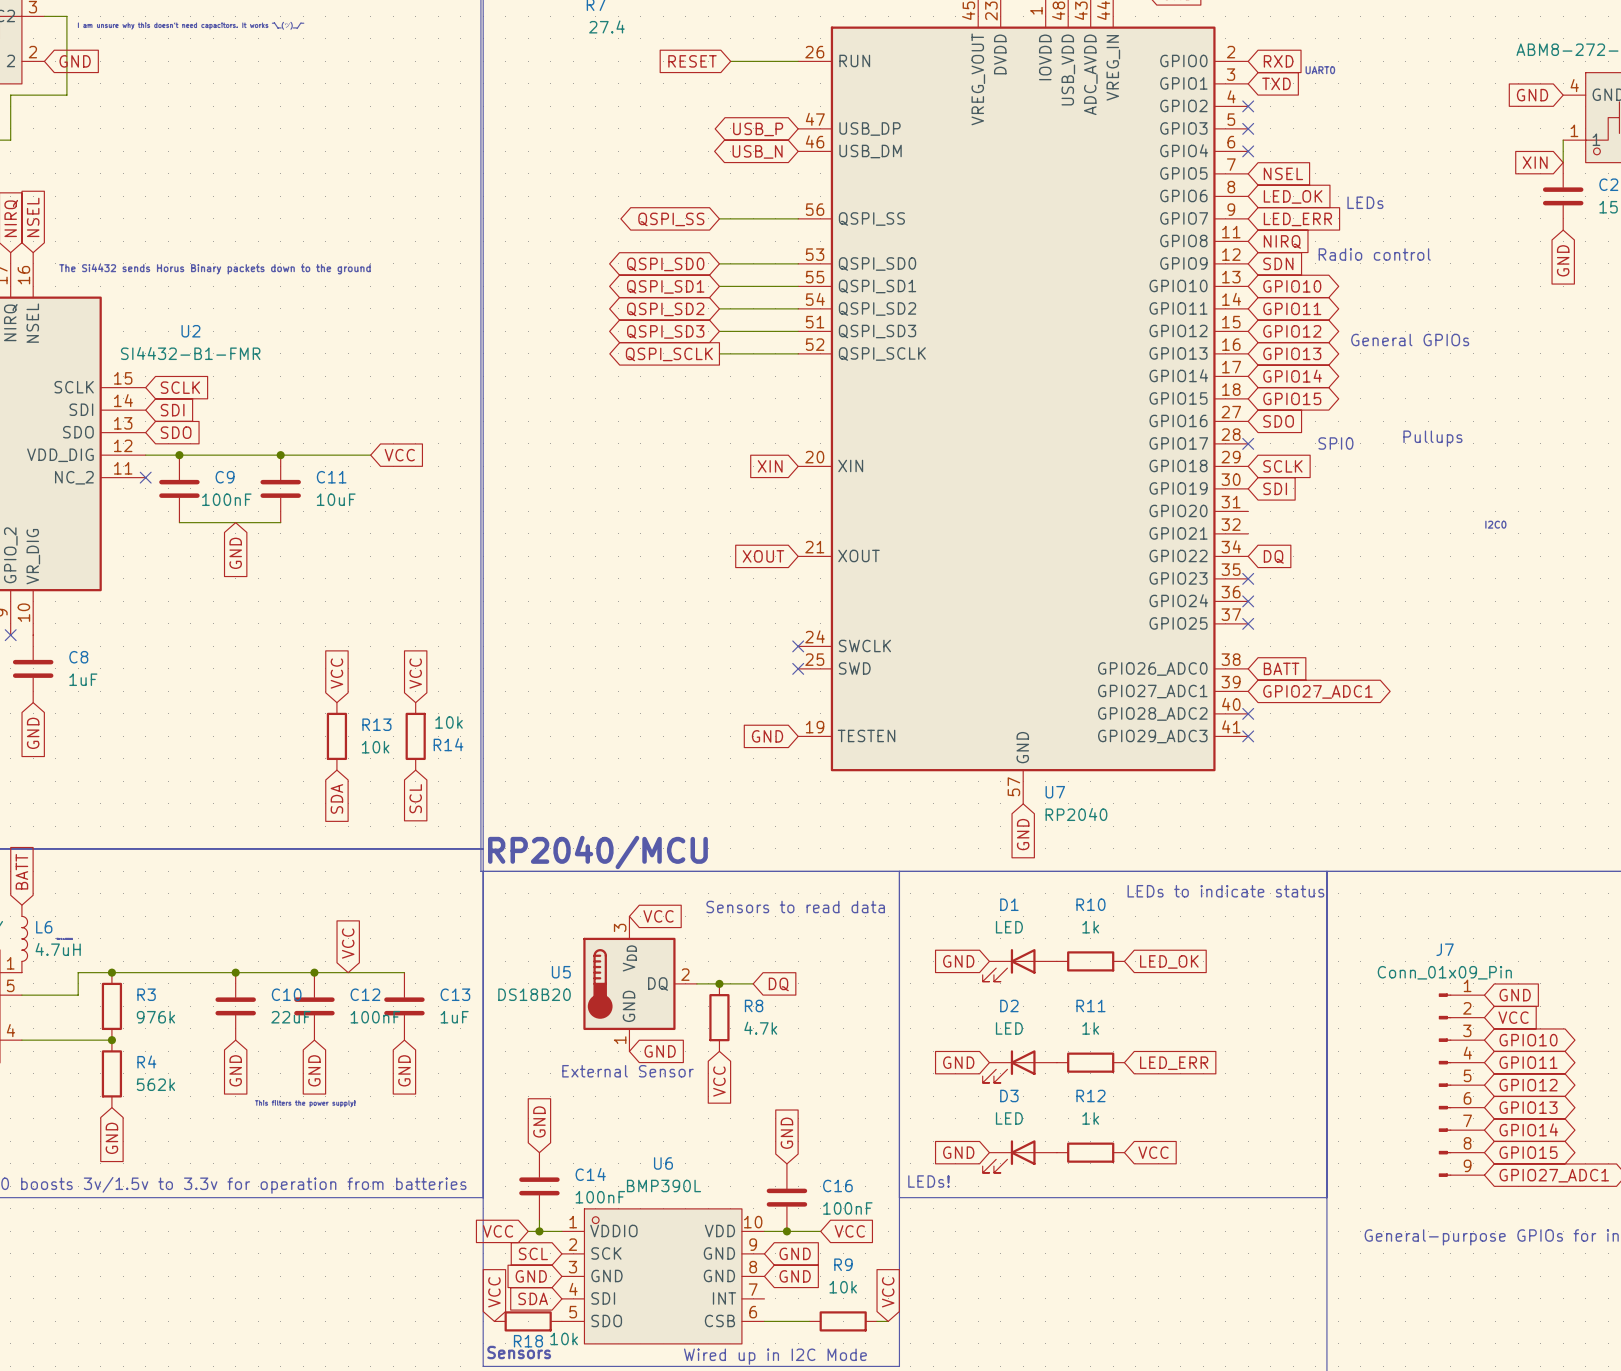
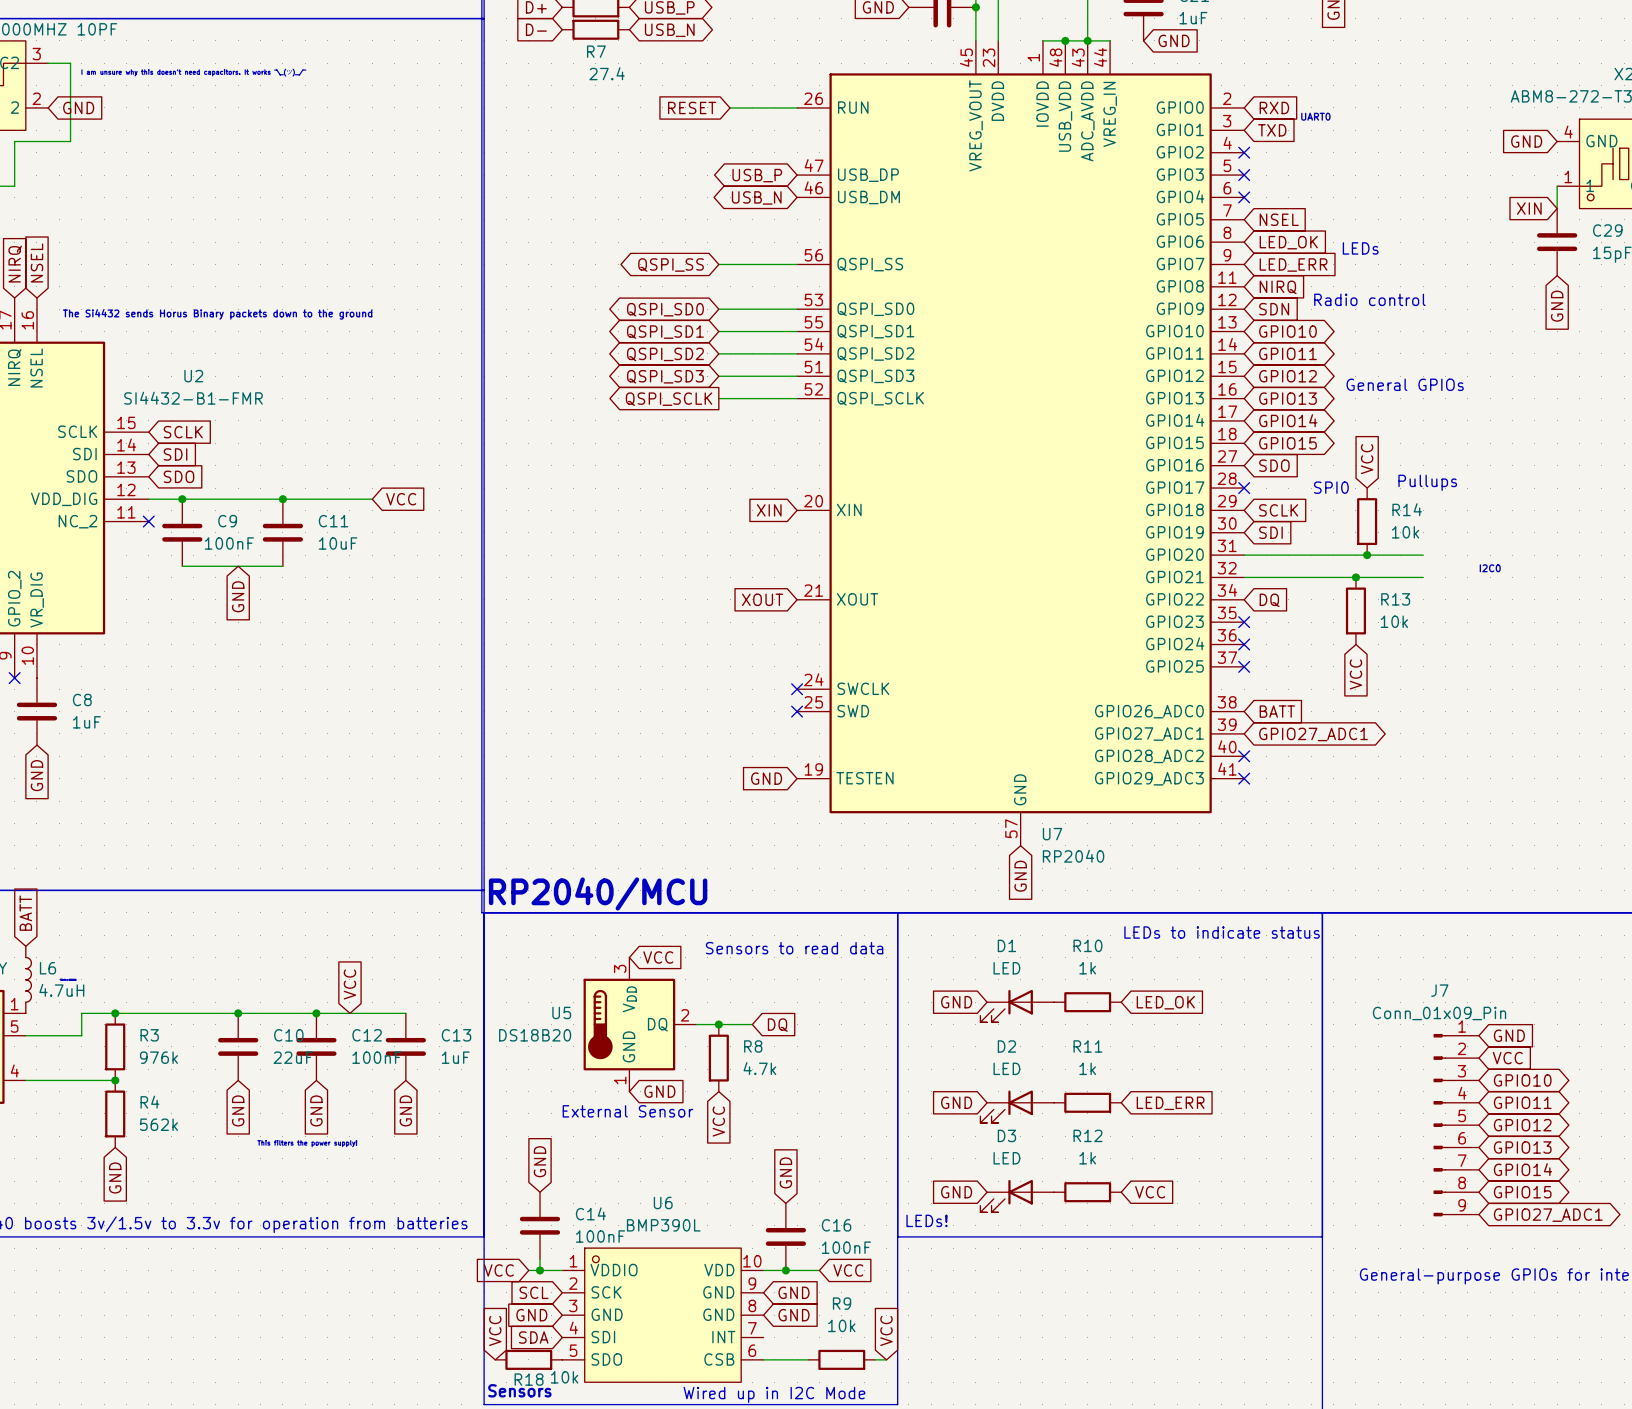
global label: none -> VCC (1367, 459)
wire: none -> (1244, 555) (1423, 555)
junction: none -> (1367, 555)
wire: none -> (1244, 577) (1423, 577)
junction: none -> (1355, 577)
global label: none -> VCC (1355, 674)
global label: VCC (336, 673) -> none
global label: VCC (415, 673) -> none
R14 value position: 10k (449, 722) -> 10k (1405, 532)
R13 position: (336, 736) -> (1355, 610)
R14 position: (415, 736) -> (1367, 521)
R14 name position: R14 (448, 744) -> R14 (1407, 509)
global label: SDA (336, 798) -> none
global label: SCL (415, 798) -> none

